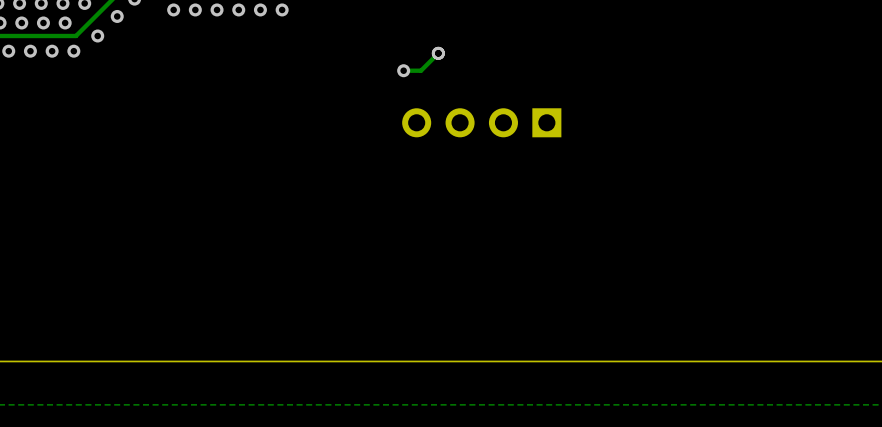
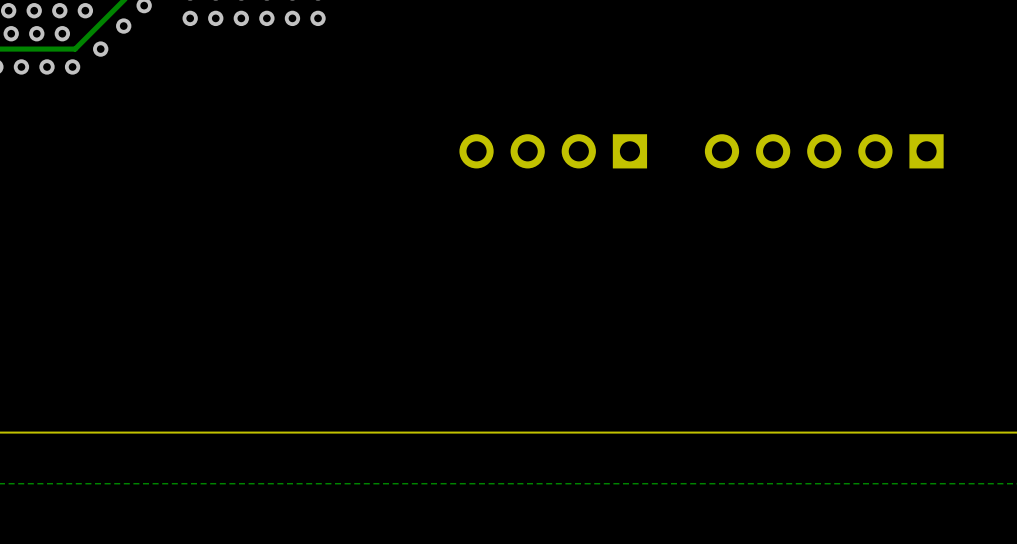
track: (438, 53) (421, 70) (403, 70) -> none
via: (438, 53) -> none
via: (403, 70) -> none
part: none -> (824, 151)

